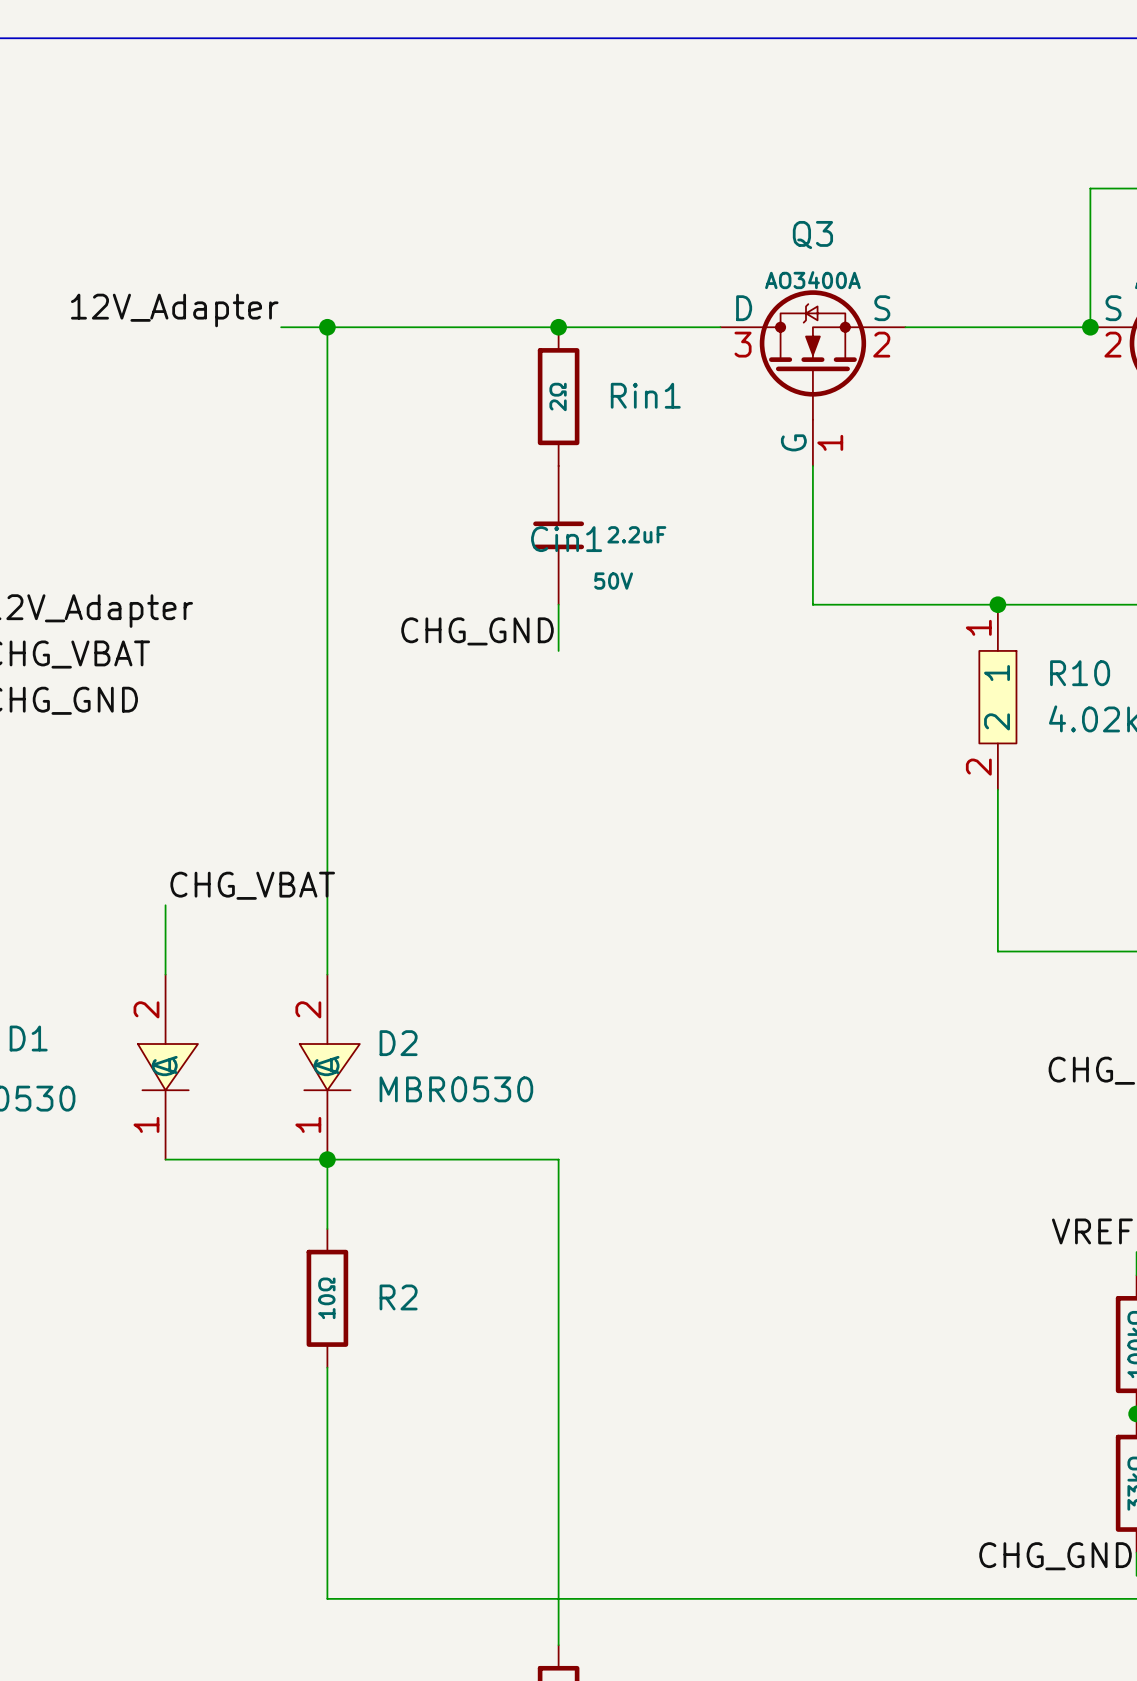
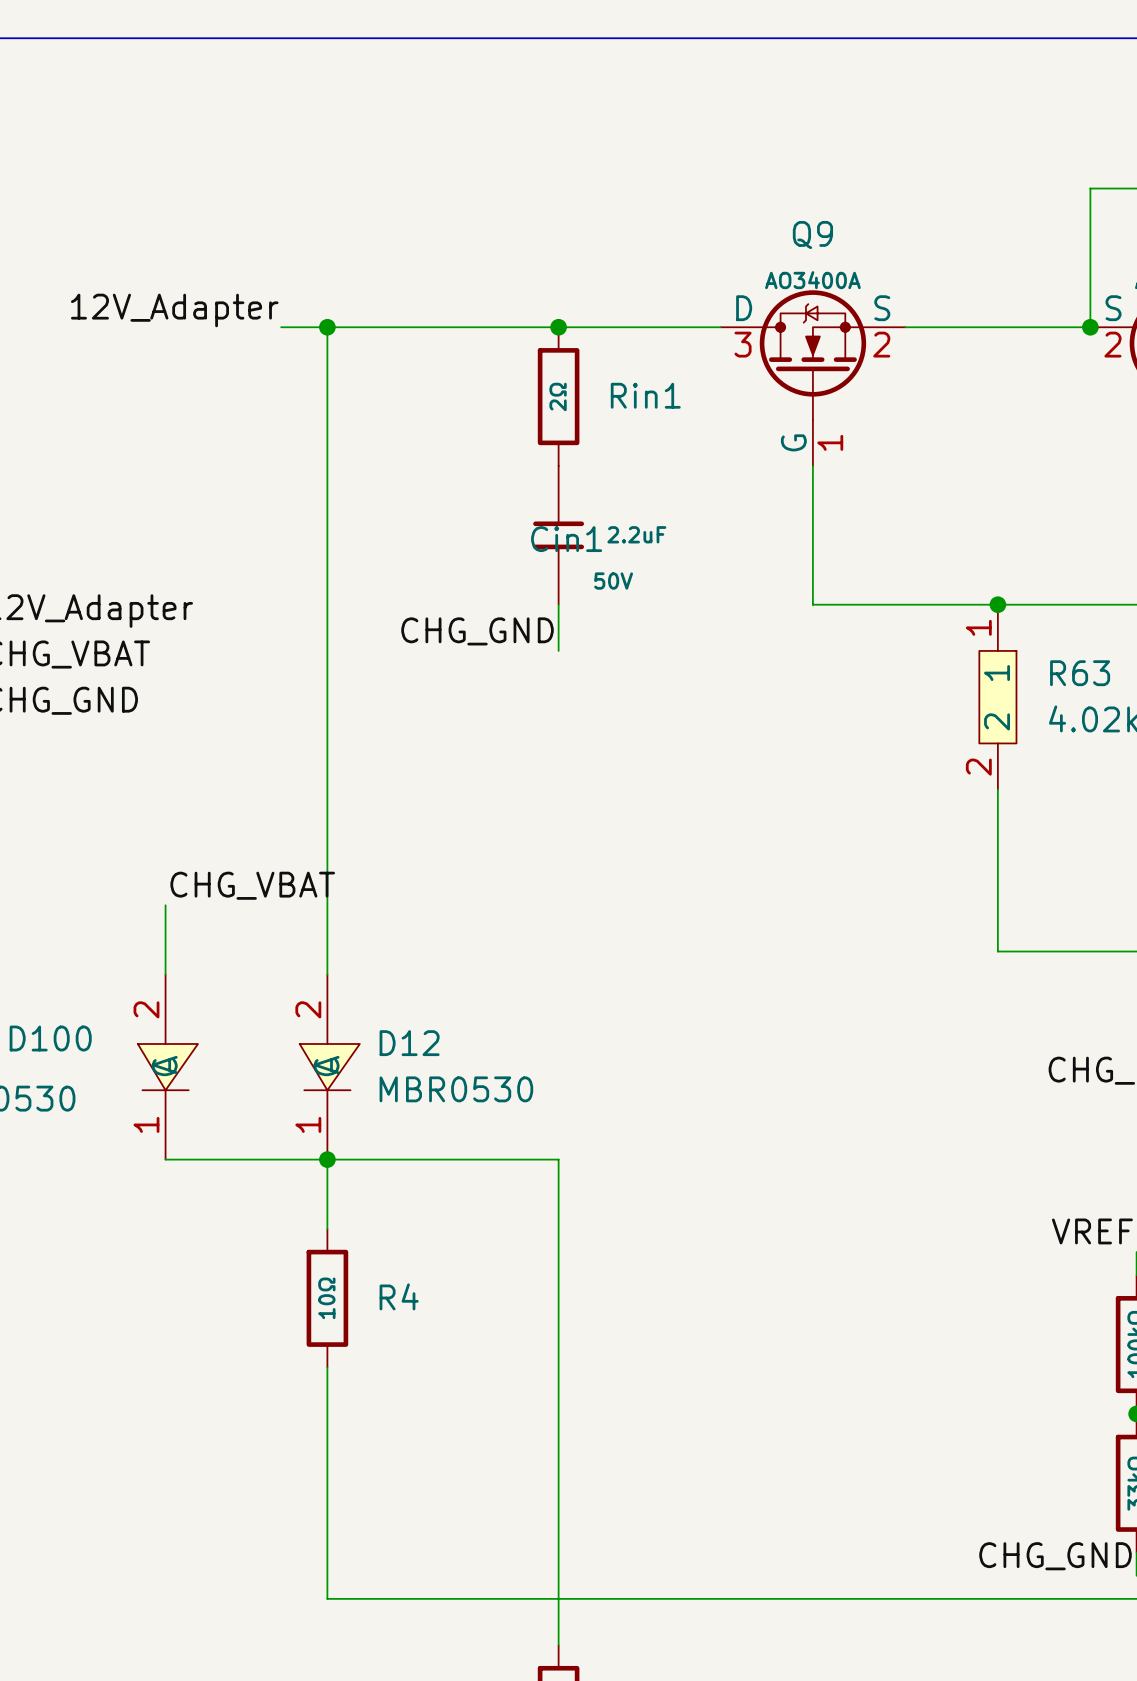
Q3 name: Q3 (812, 235) -> Q9 (812, 235)
R10 name: R10 (1080, 673) -> R63 (1080, 673)
D1 name: D1 (28, 1038) -> D100 (50, 1038)
D2 name: D2 (398, 1043) -> D12 (409, 1043)
R2 name: R2 (398, 1297) -> R4 (399, 1296)

